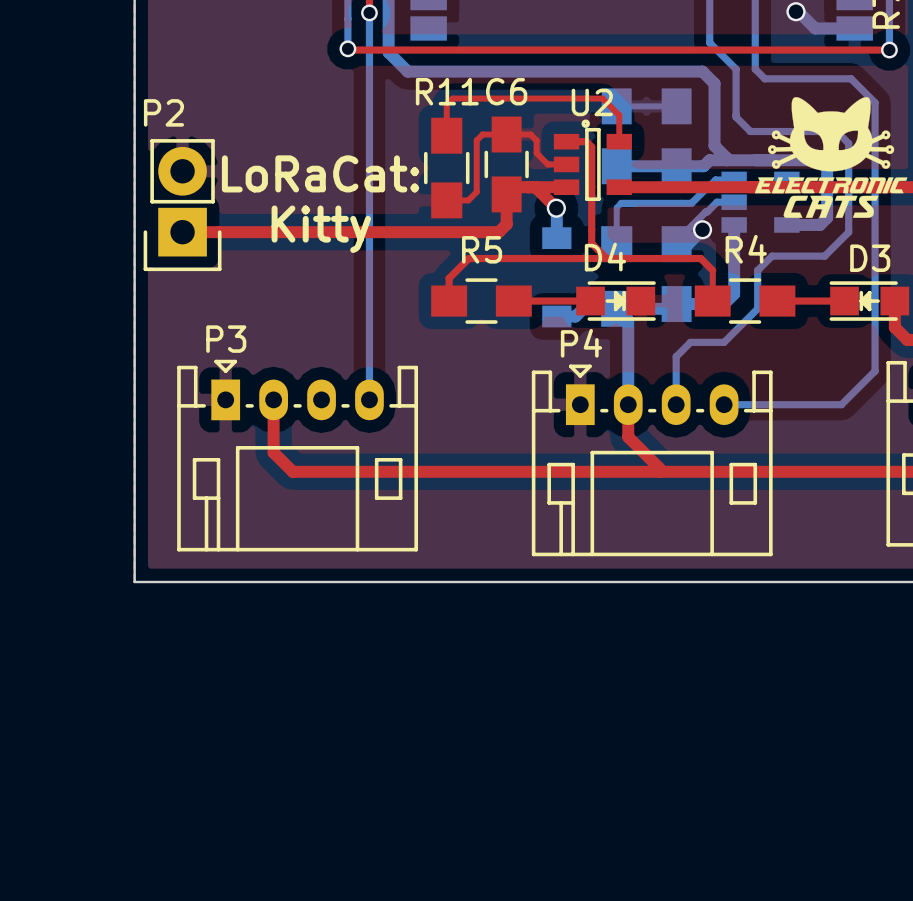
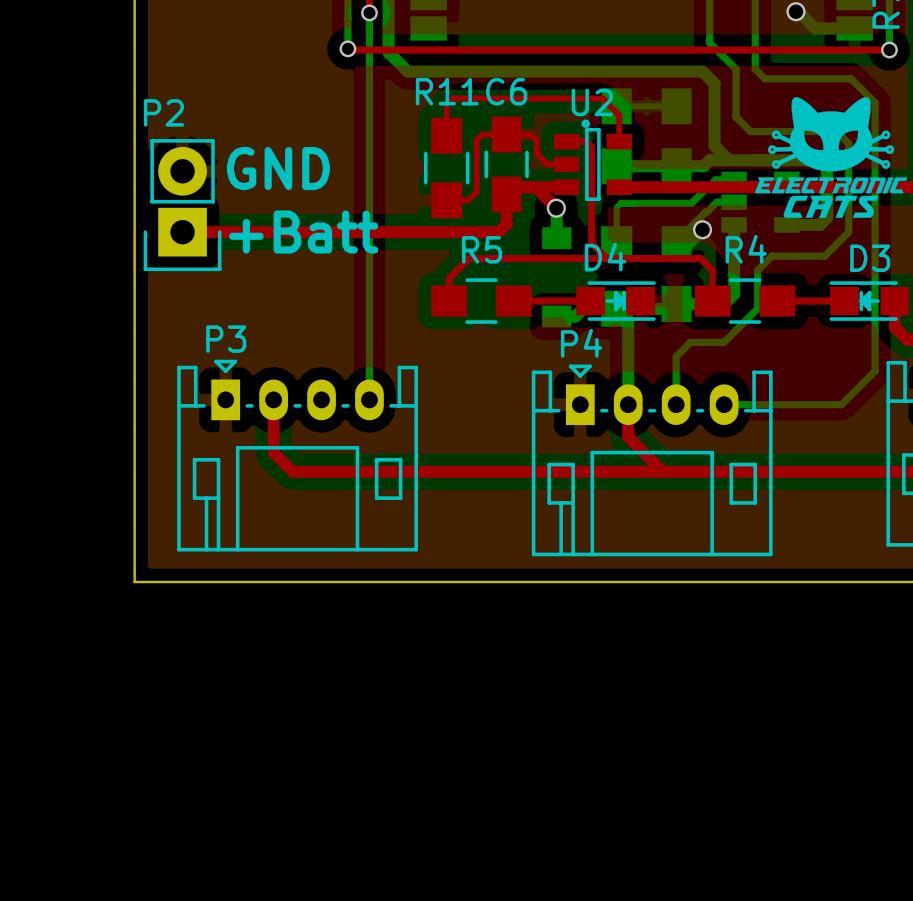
text: none -> GND (278, 168)
text: LoRaCat: (320, 173) -> none
text: Kitty (321, 229) -> +Batt (303, 232)

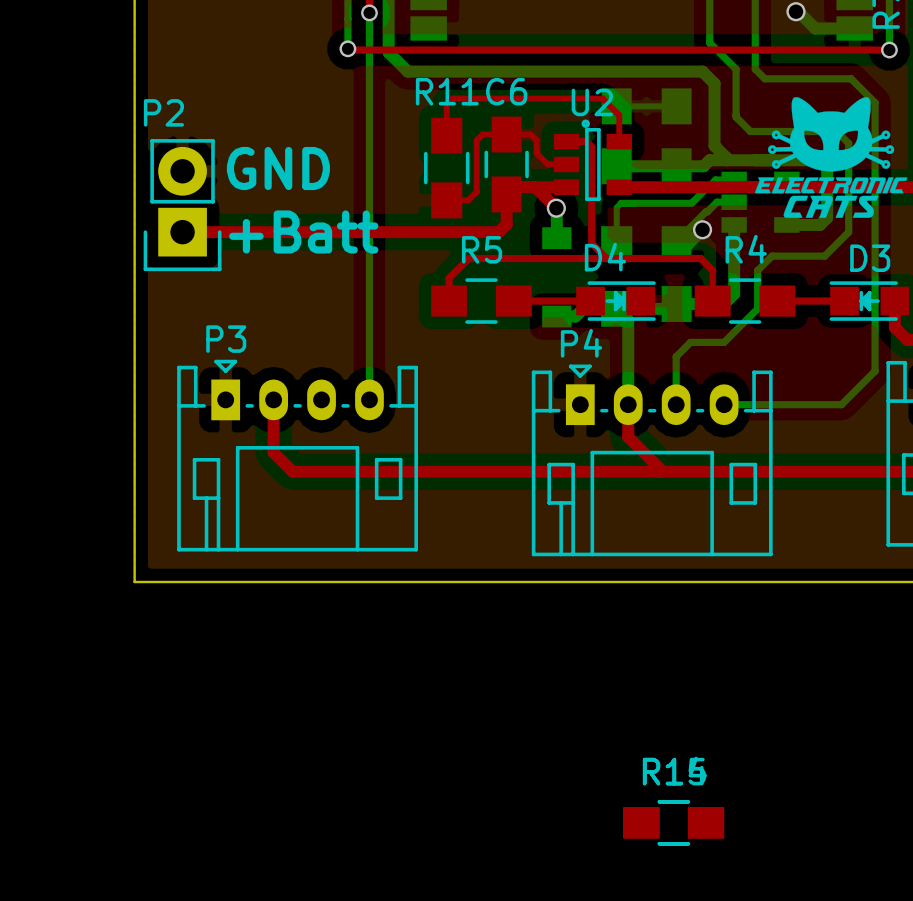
part: none -> (673, 822)
part: none -> (673, 822)

